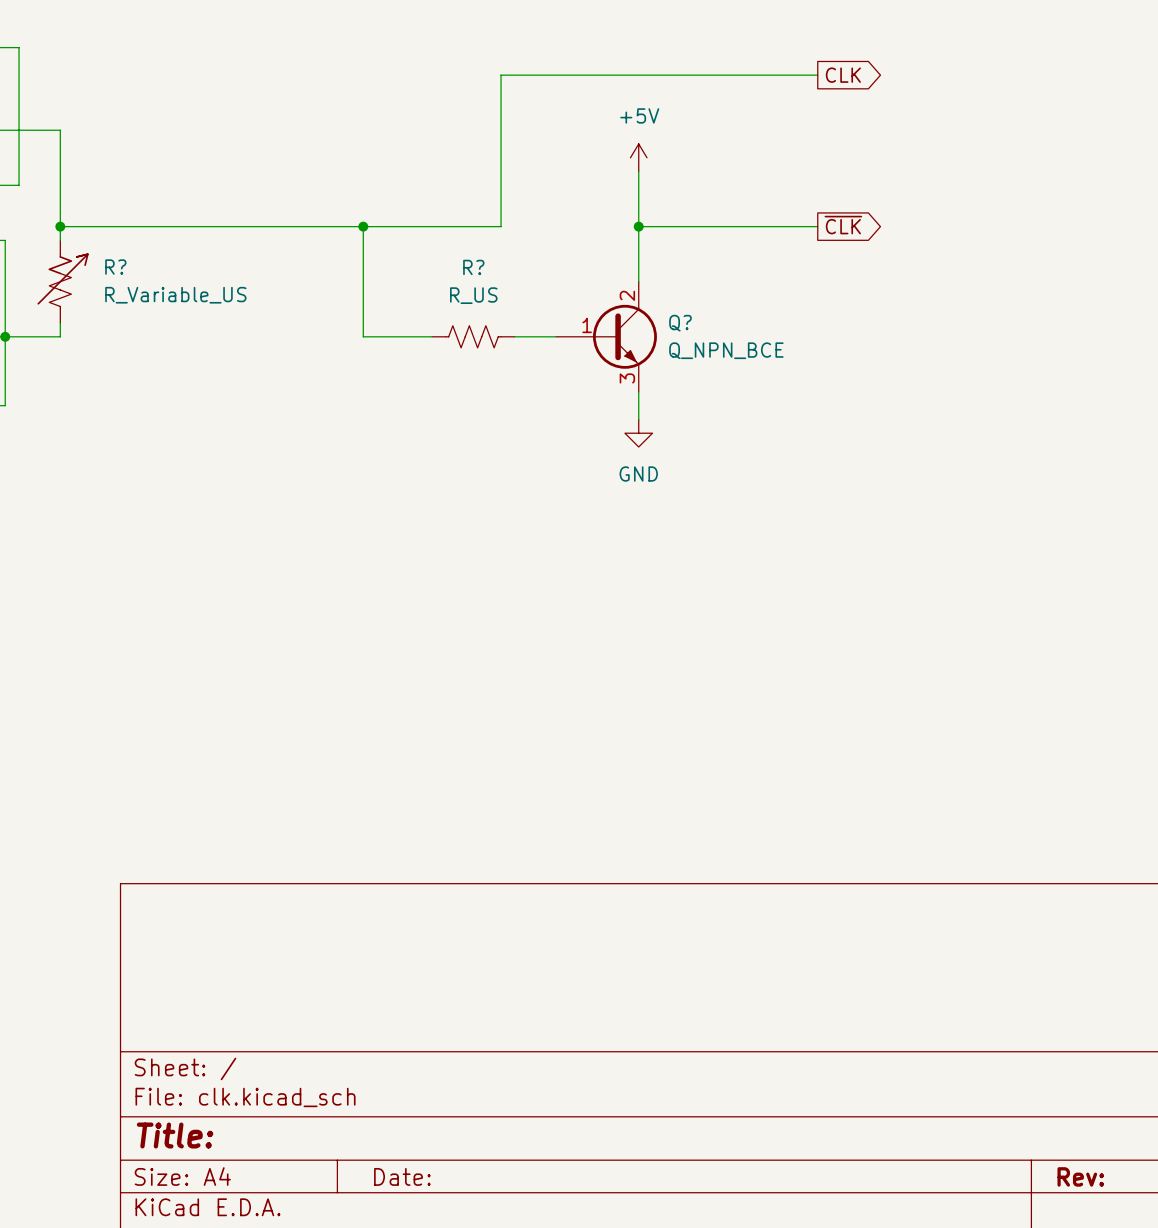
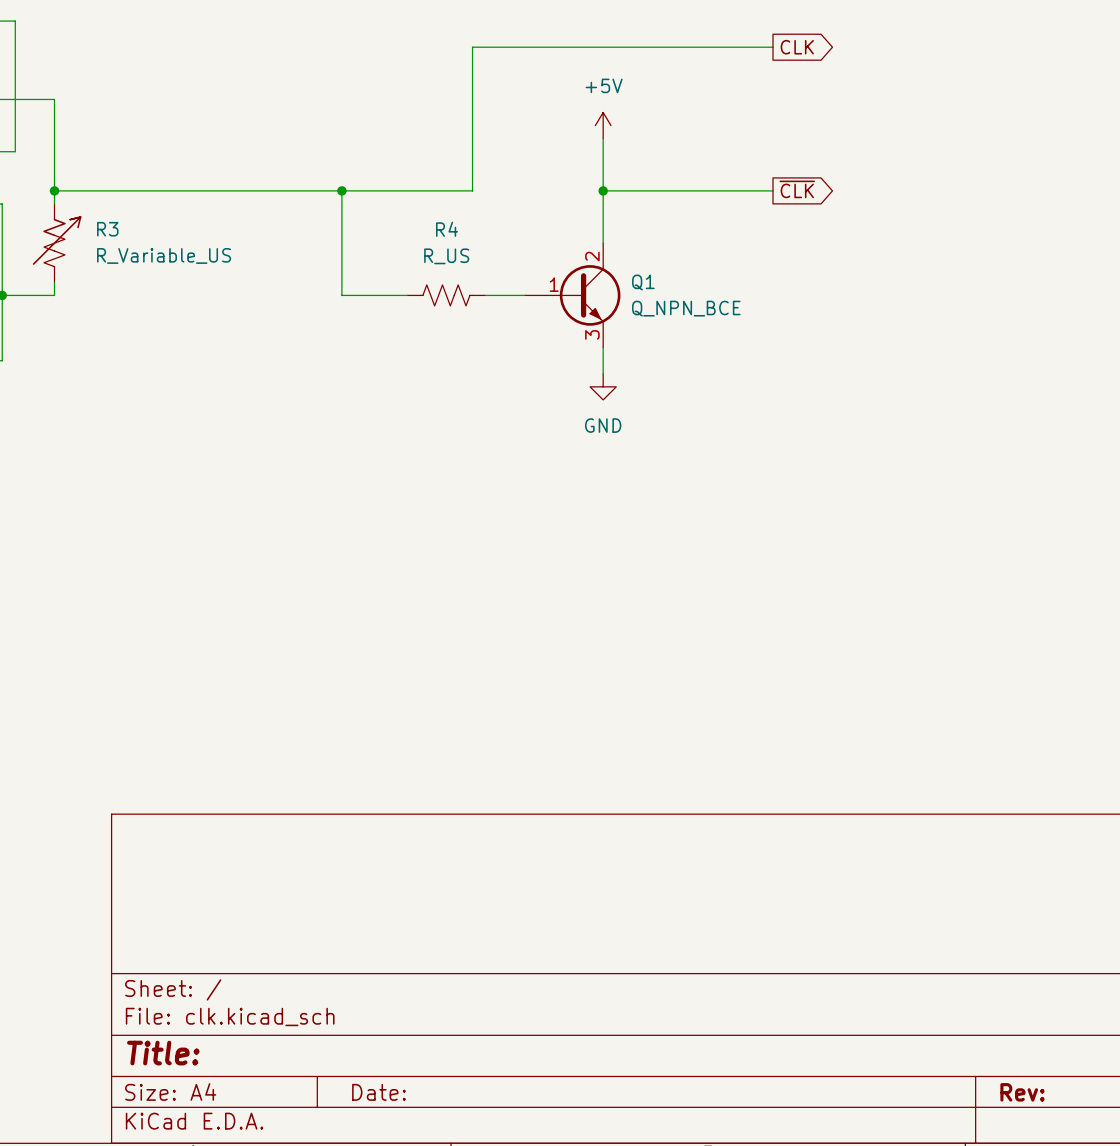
R? name: R? (115, 267) -> R3 (107, 229)
R? name: R? (473, 267) -> R4 (447, 229)
Q? name: Q? (680, 323) -> Q1 (643, 282)

